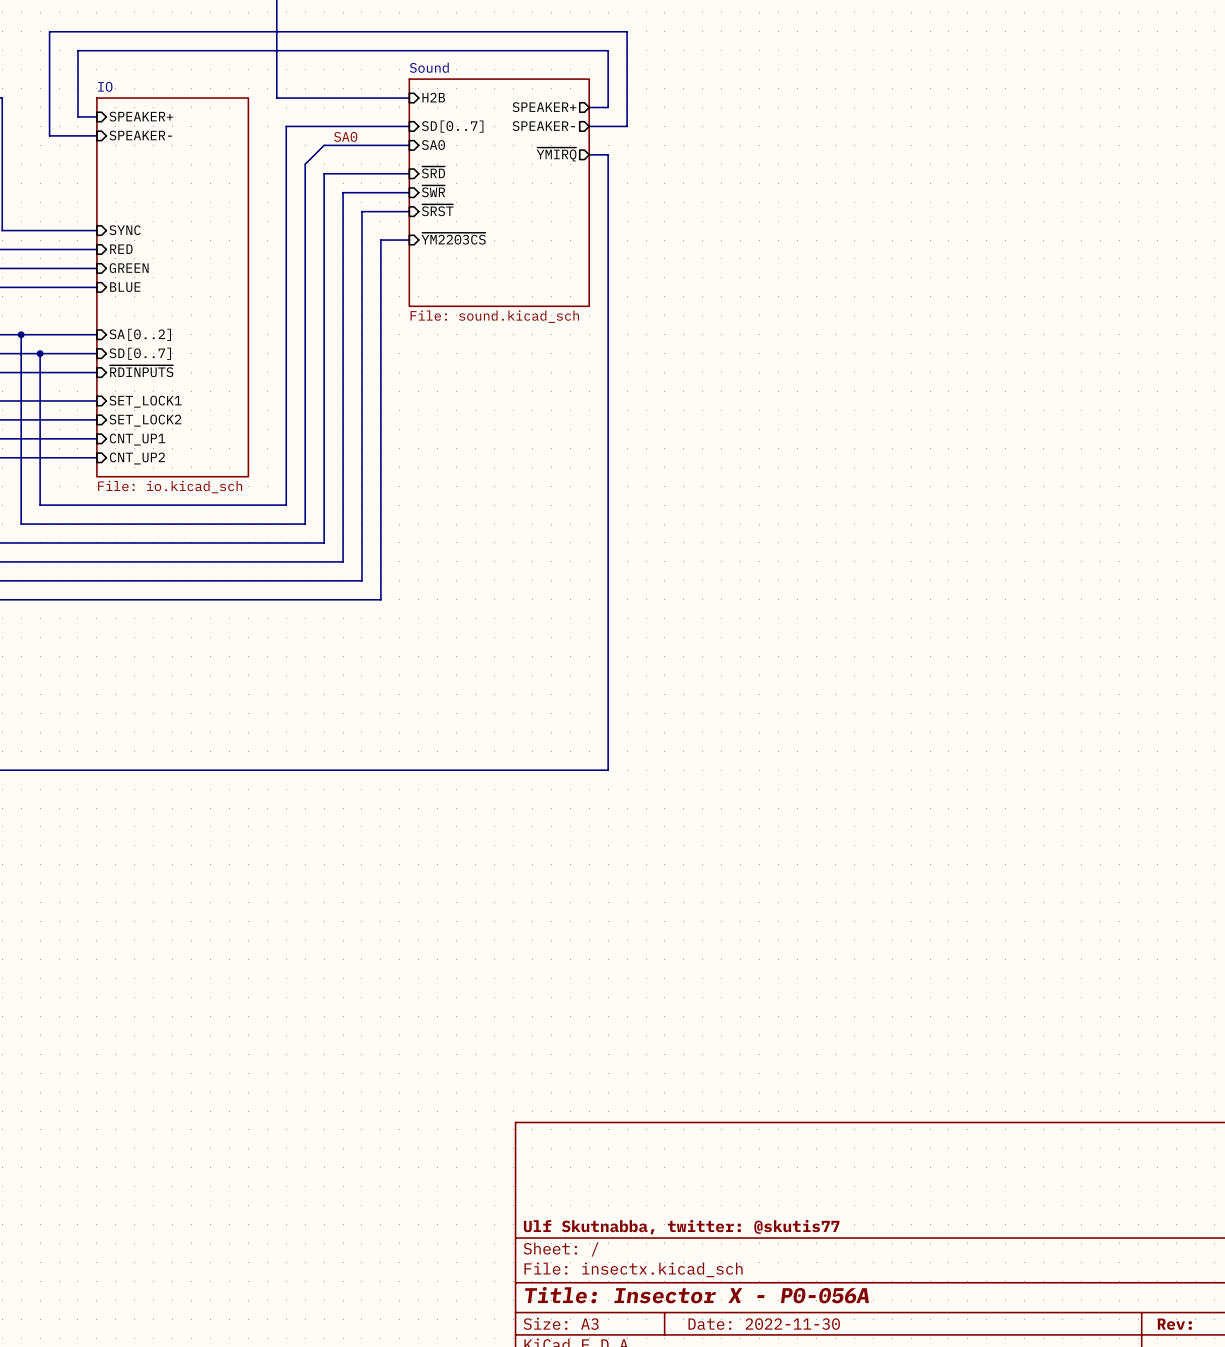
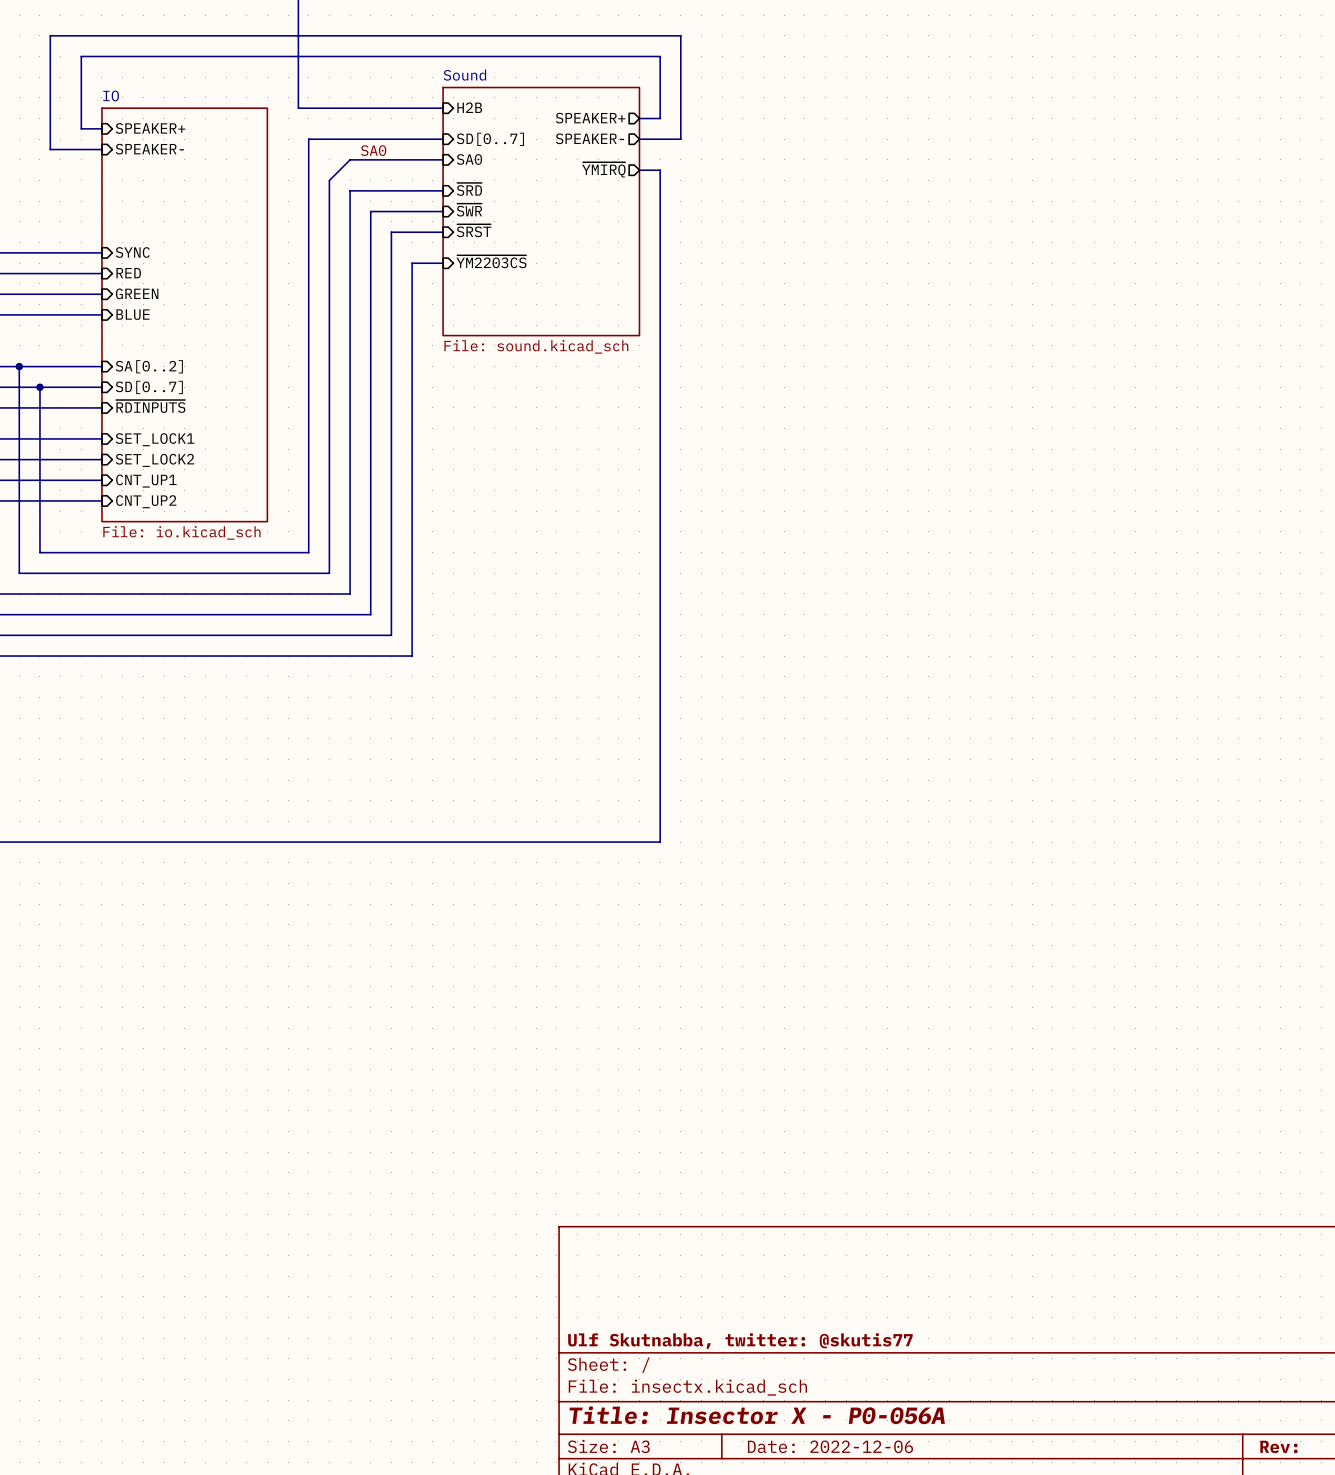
title block: Date: 2022-11-30 (764, 1324) -> Date: 2022-12-06 (830, 1446)

